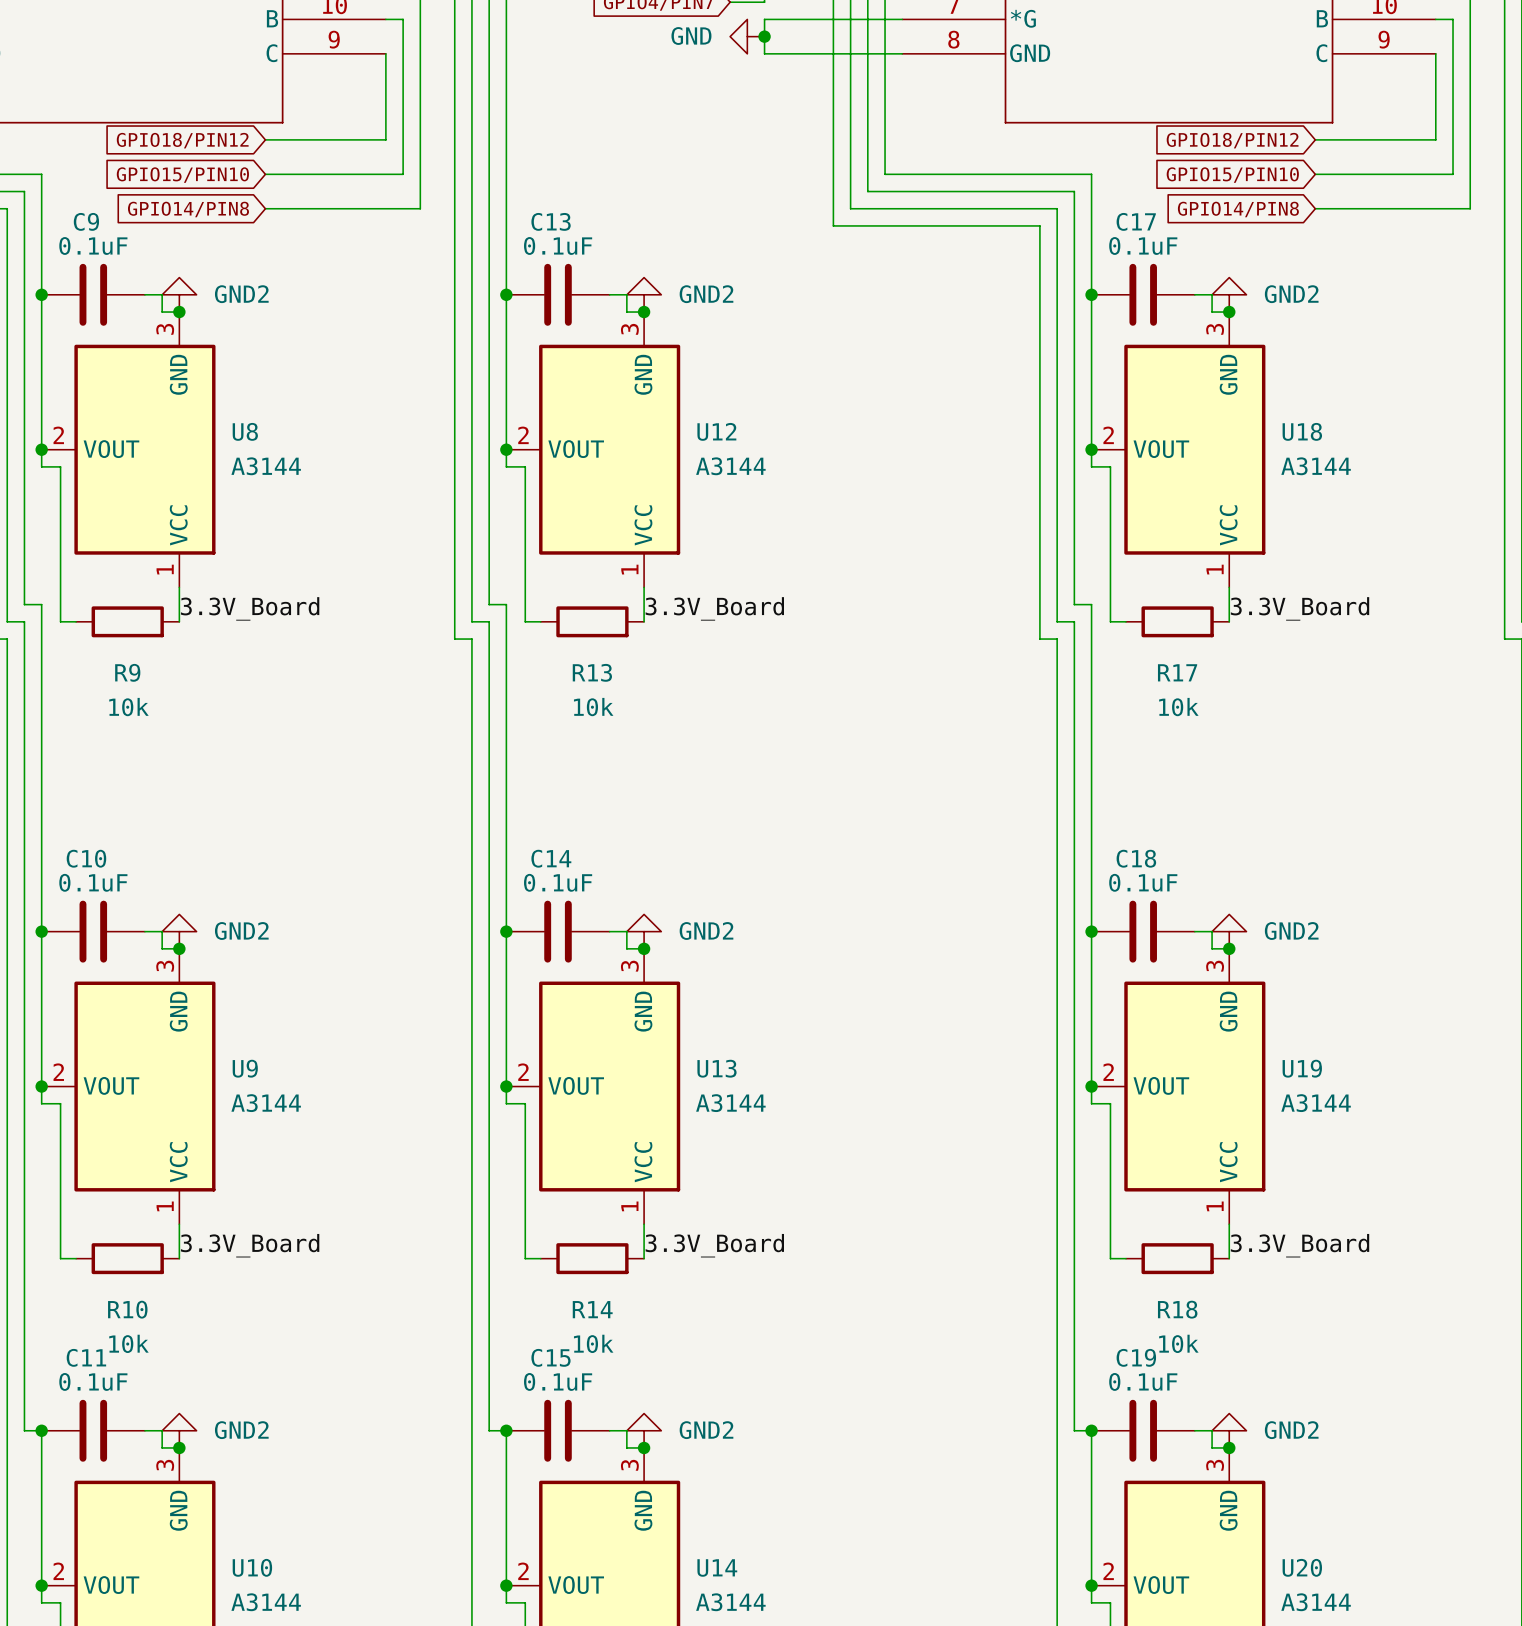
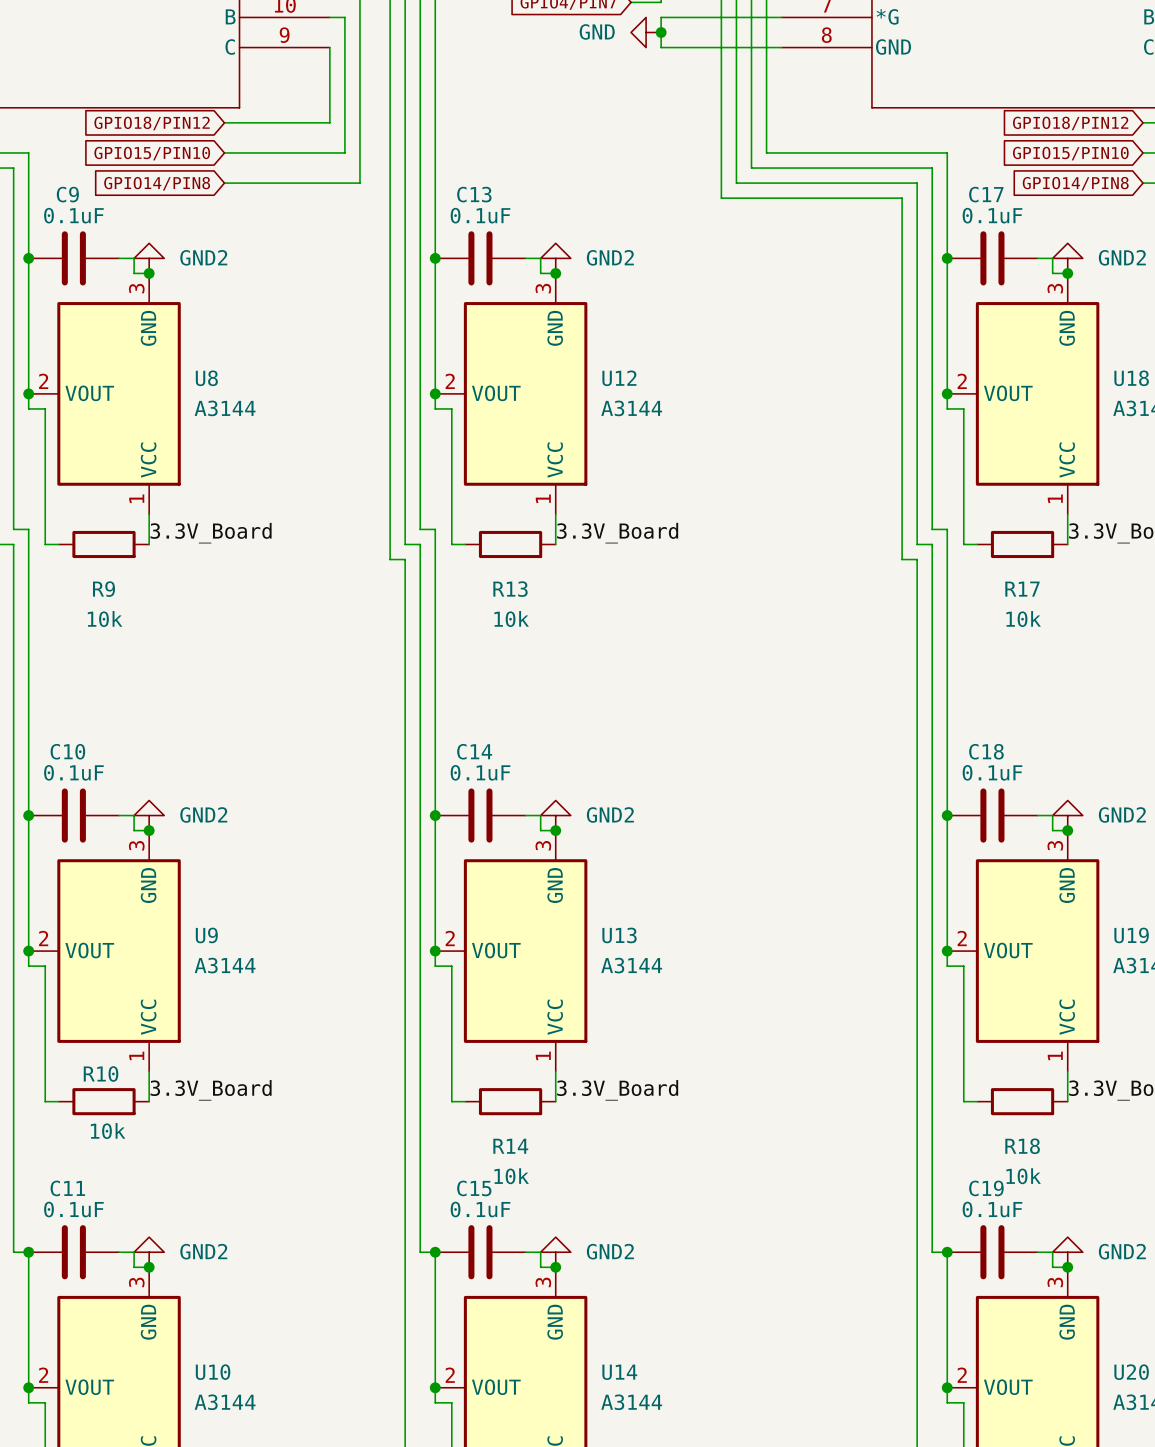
R10 name position: R10 (127, 1309) -> R10 (101, 1073)
R10 value position: 10k (128, 1343) -> 10k (108, 1131)

